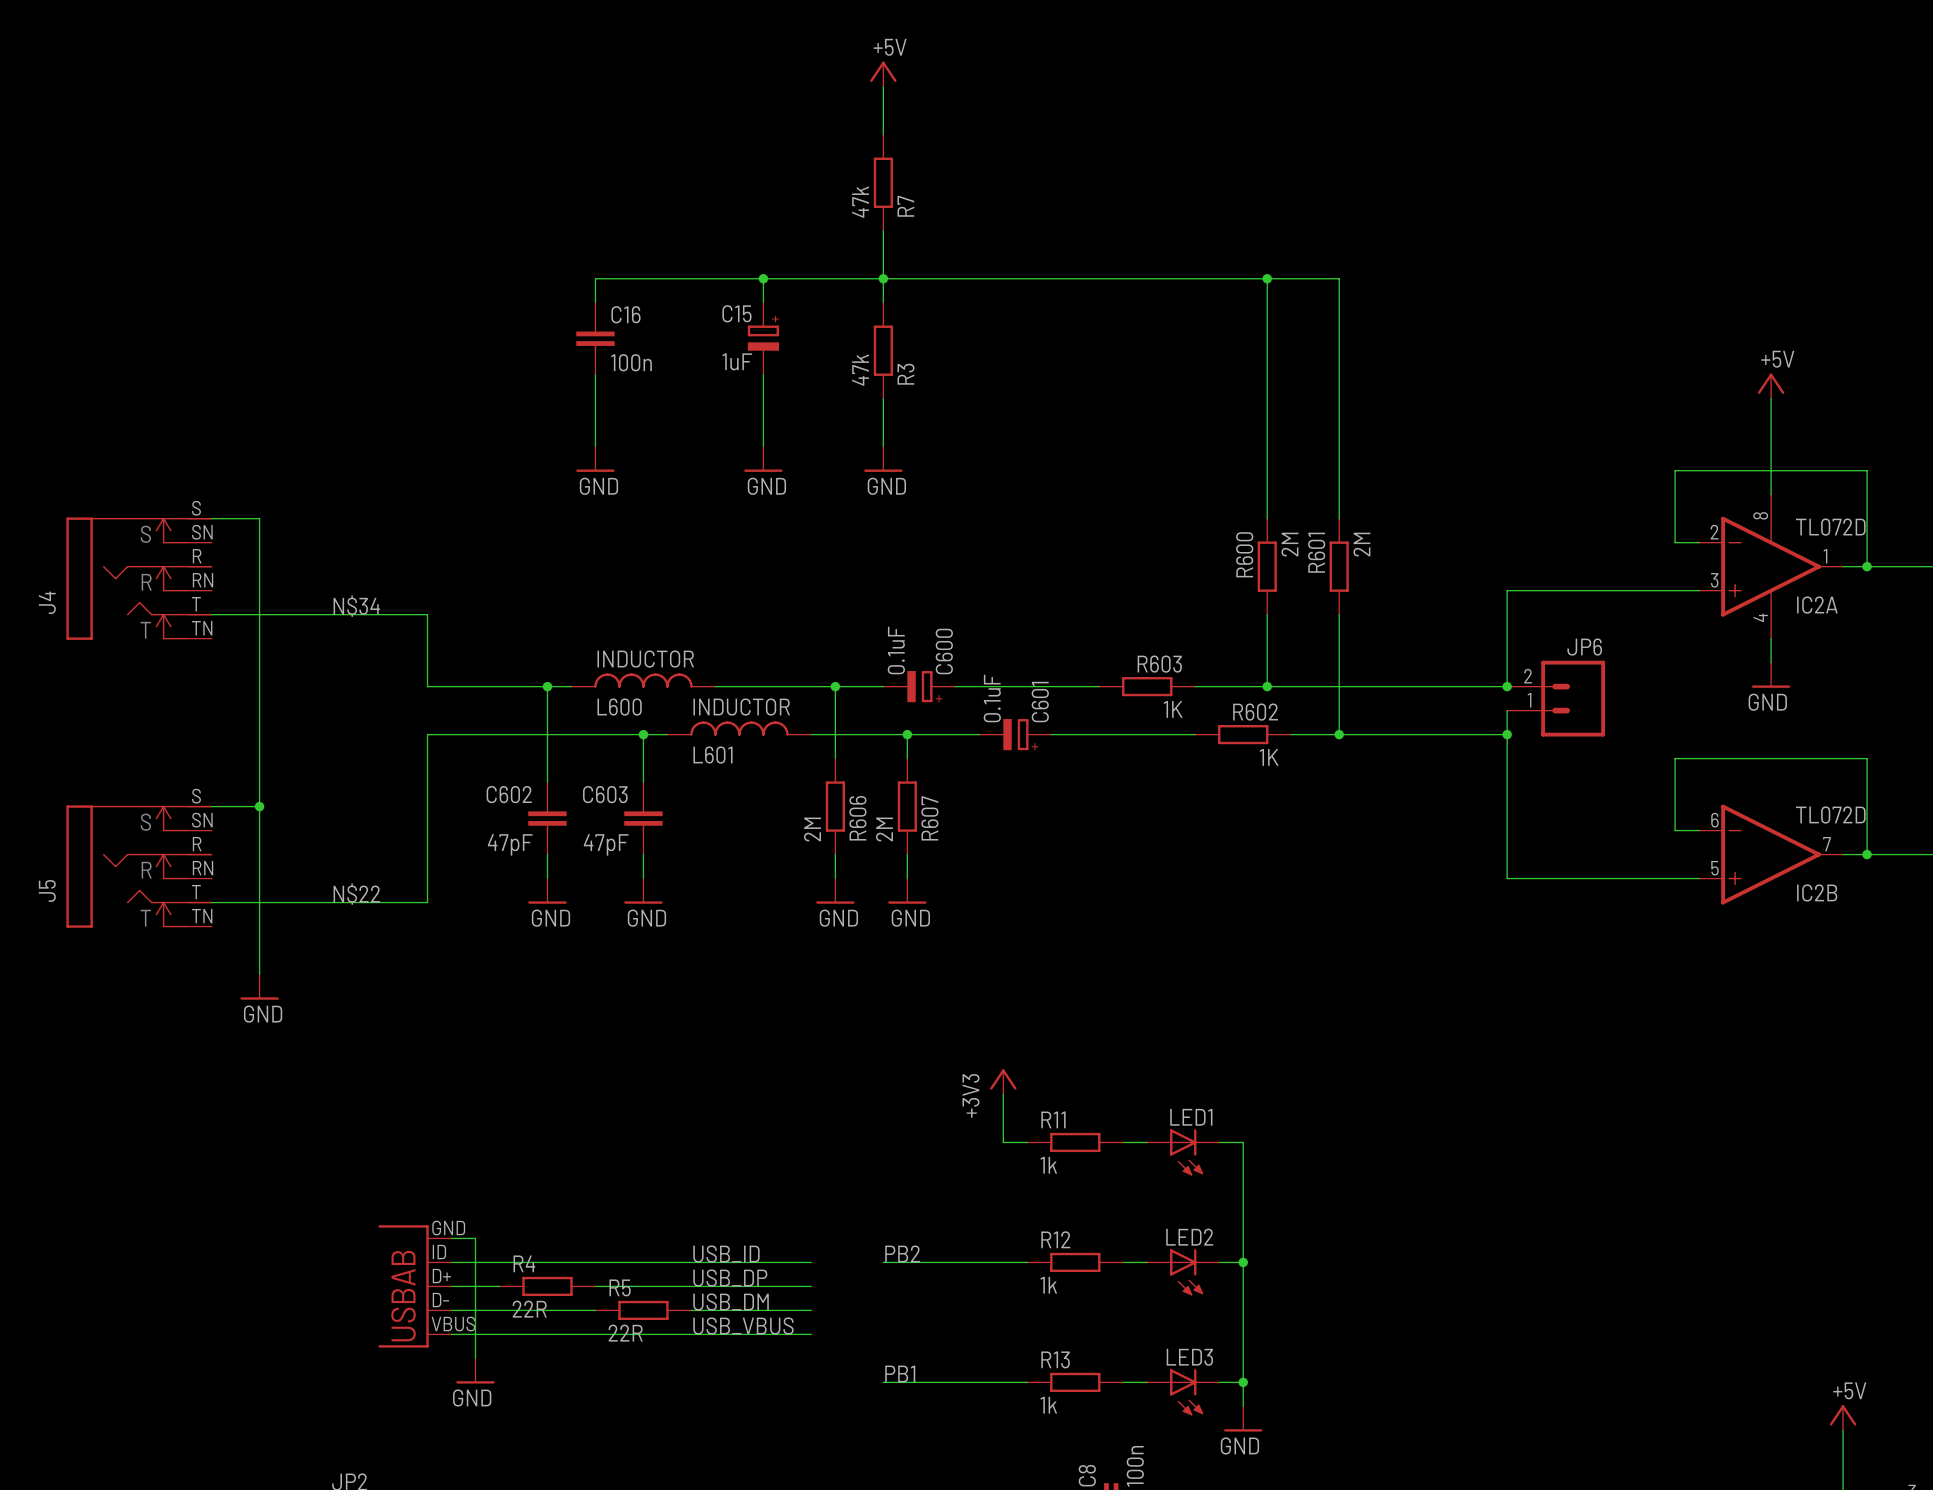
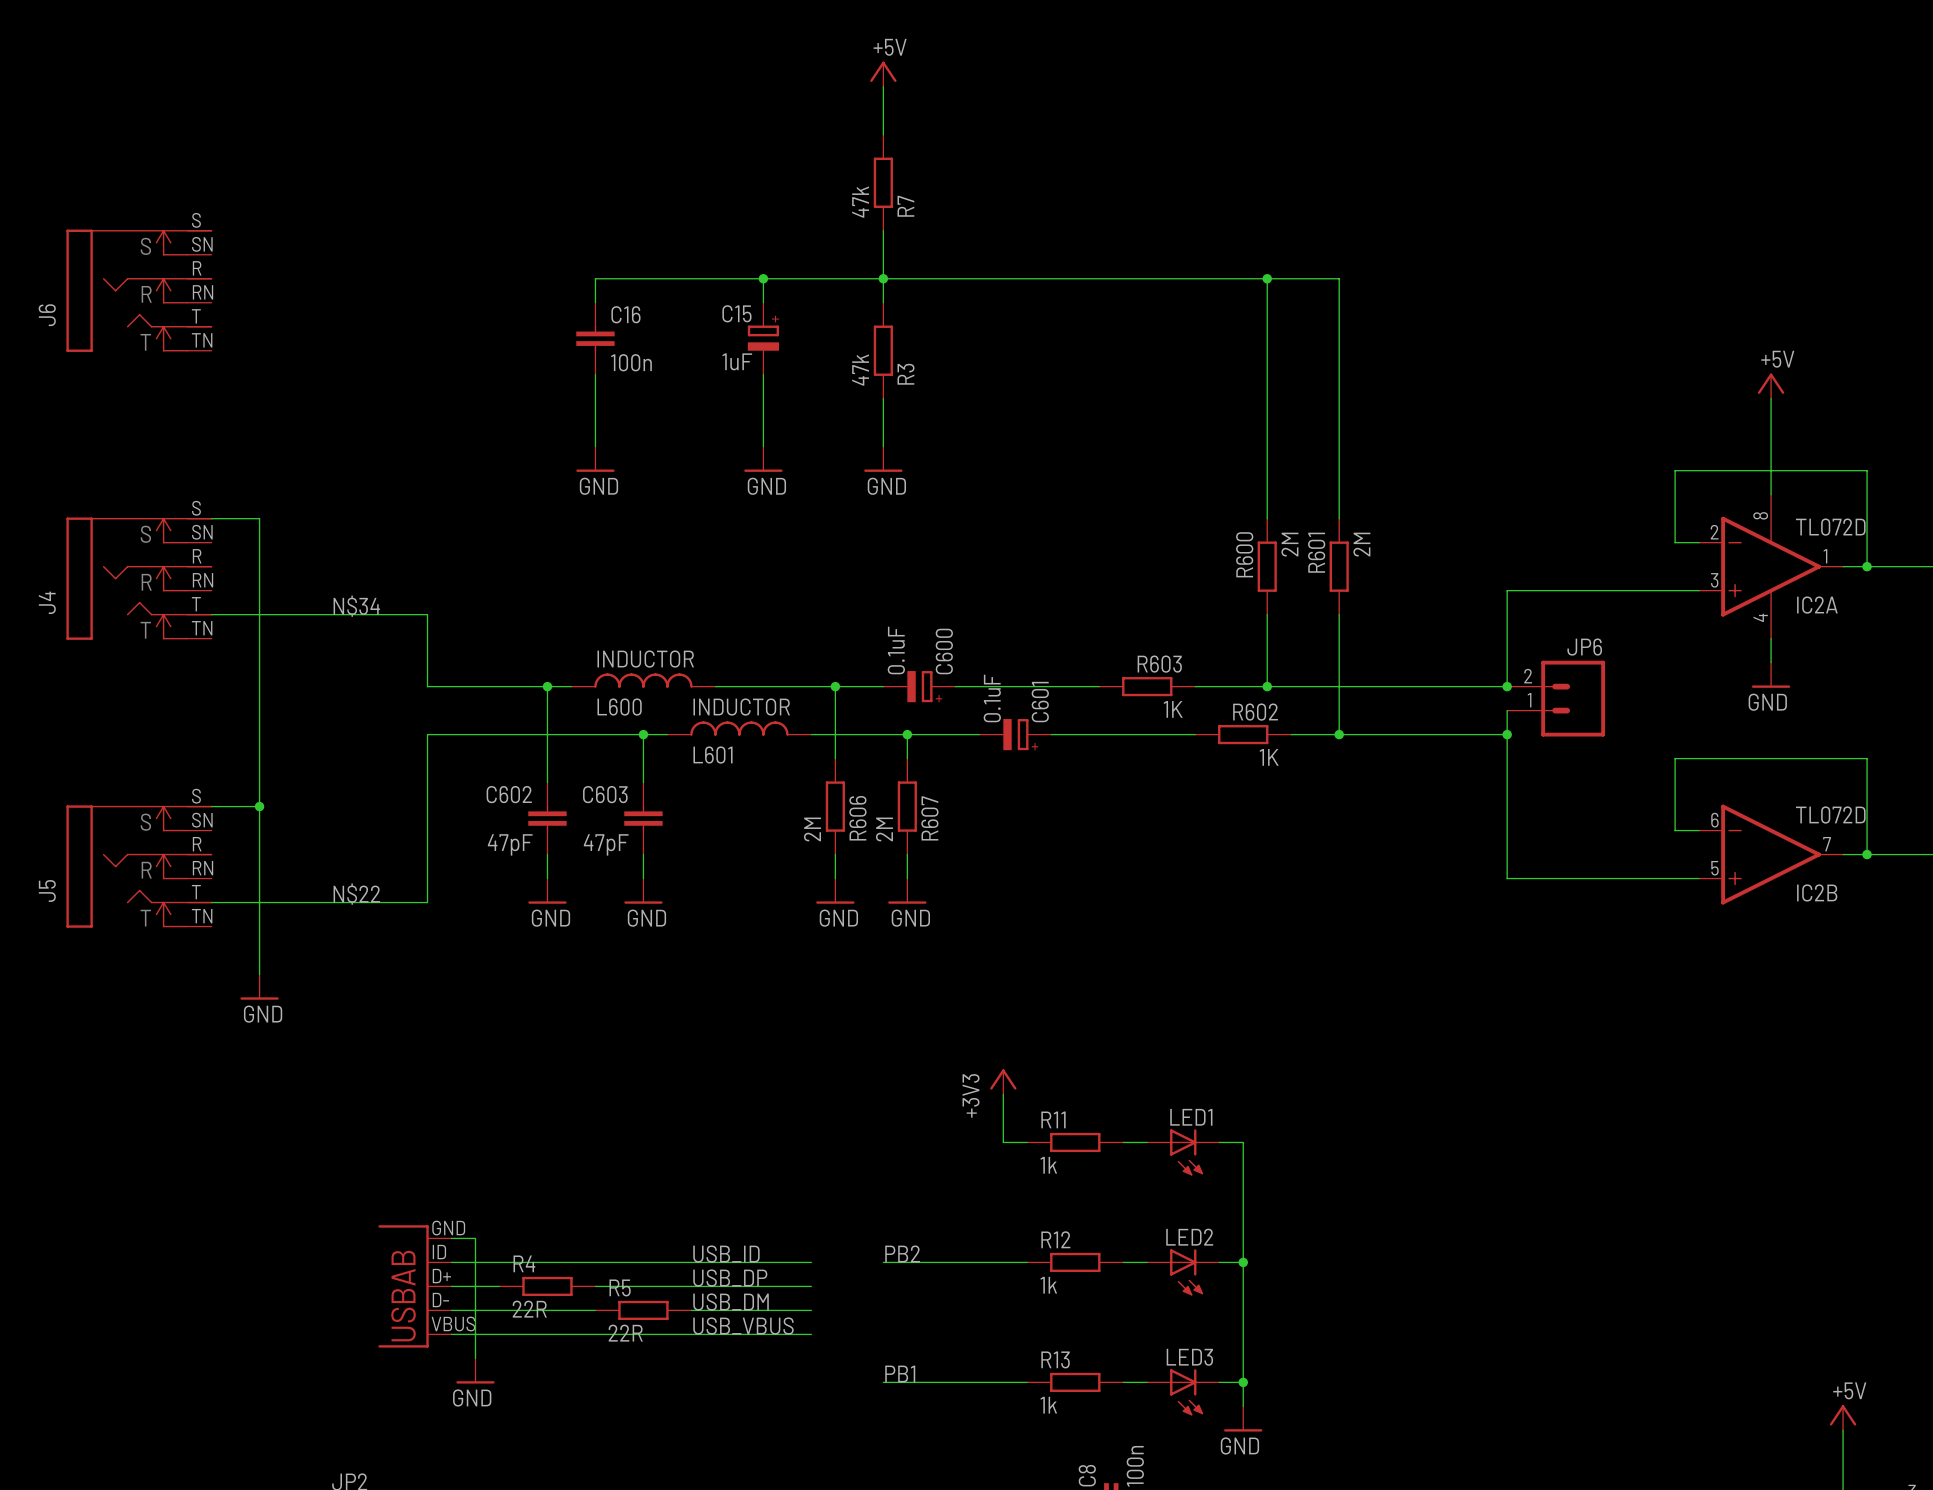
J6: none -> (139, 290)

